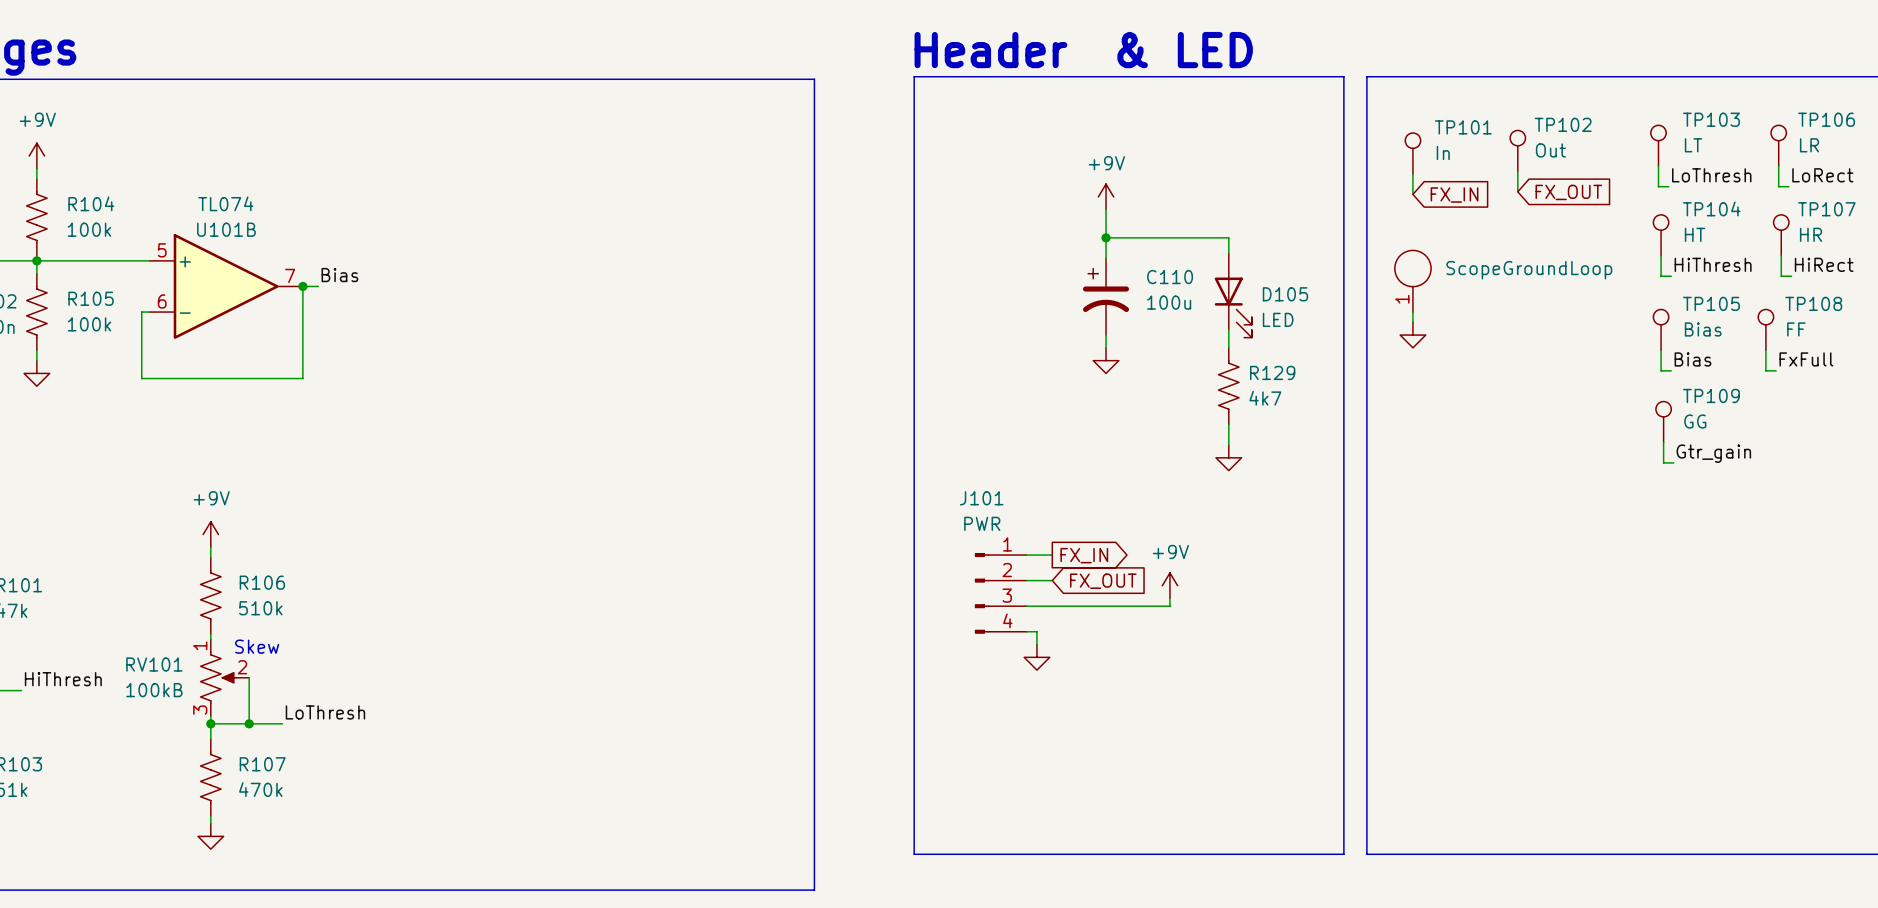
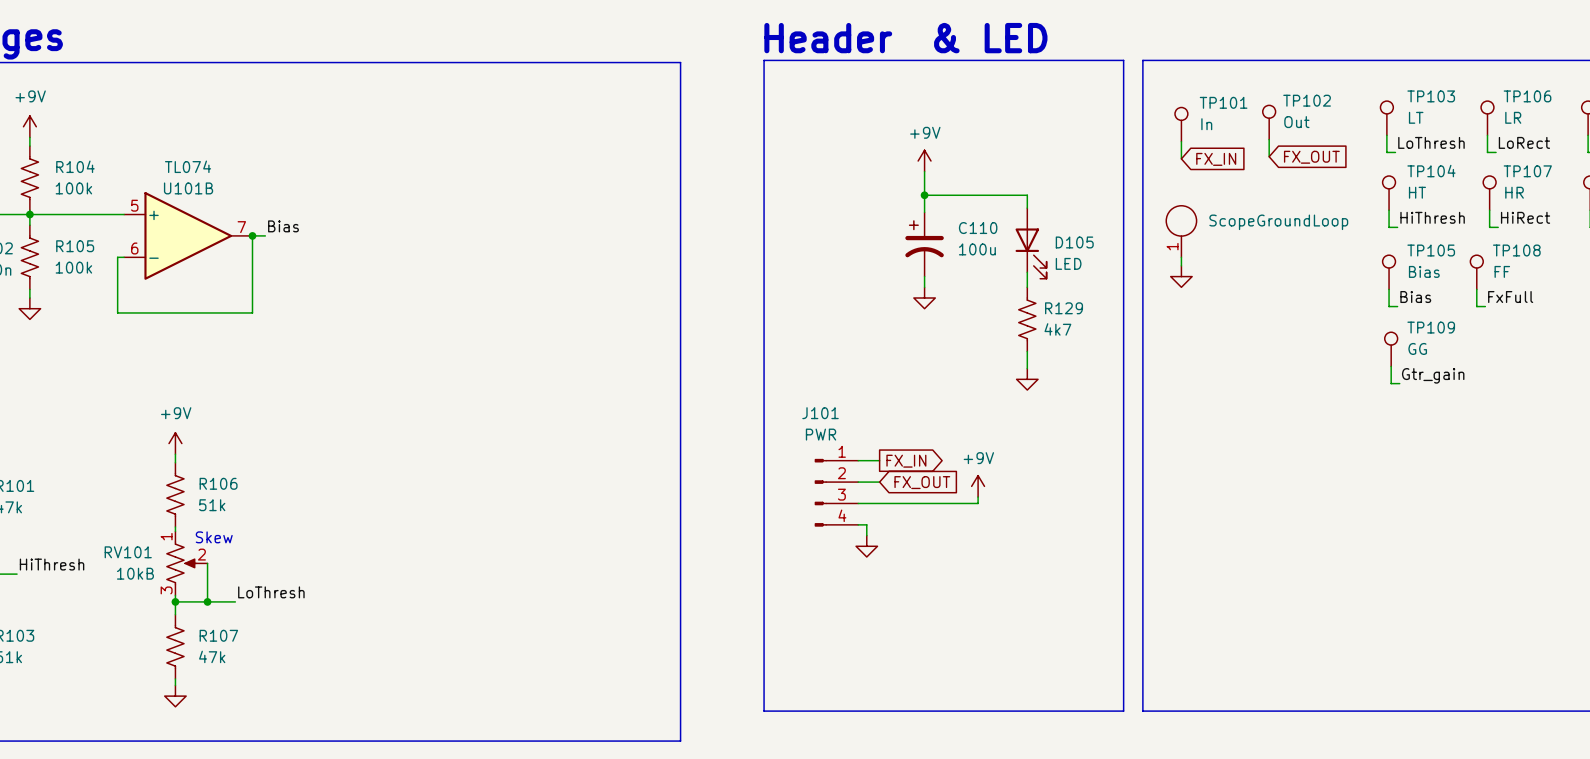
R106 value: 510k (260, 608) -> 51k (212, 505)
RV101 value: 100kB (154, 690) -> 10kB (135, 573)
R107 value: 470k (260, 789) -> 47k (212, 656)

